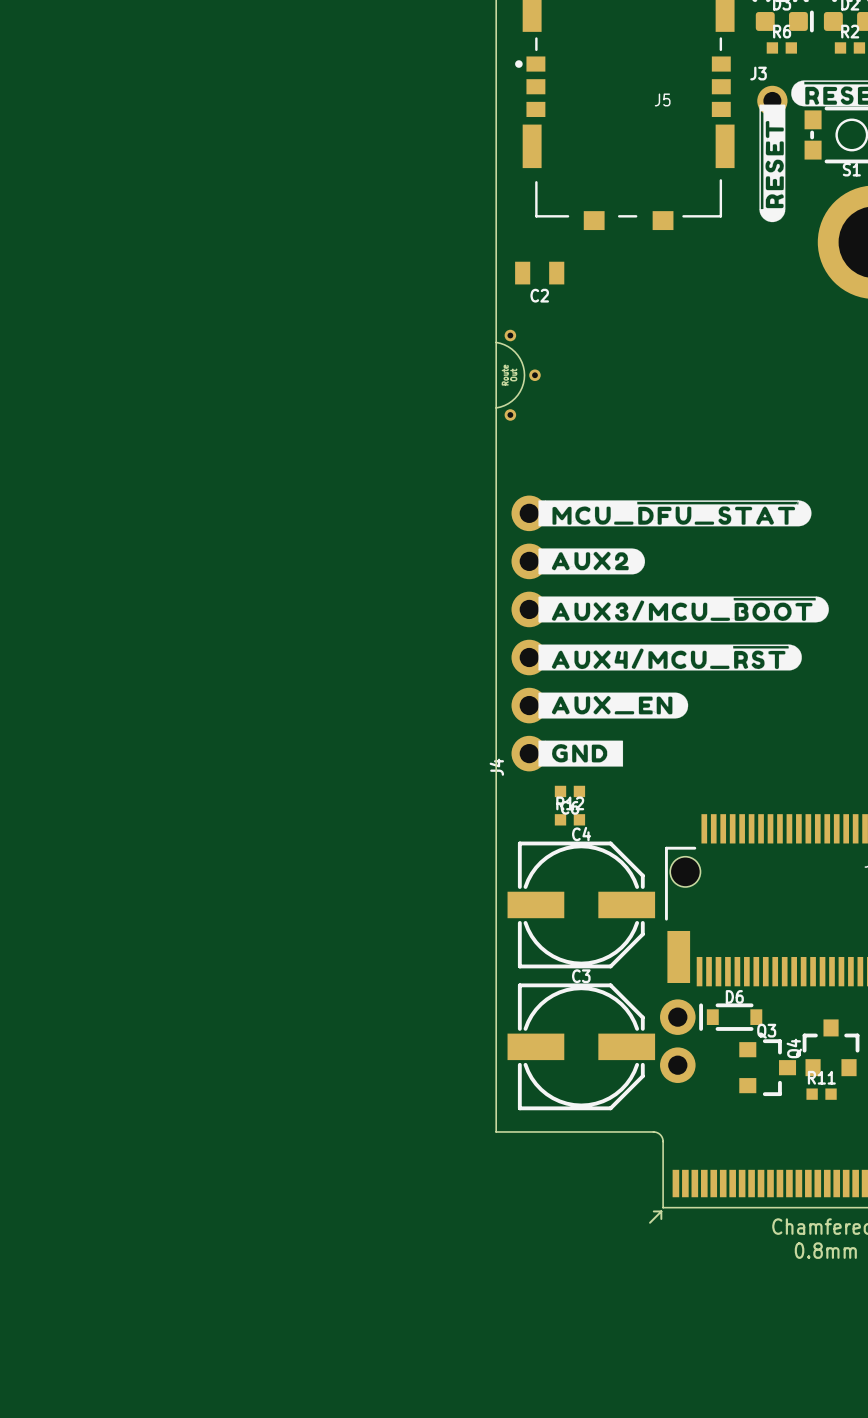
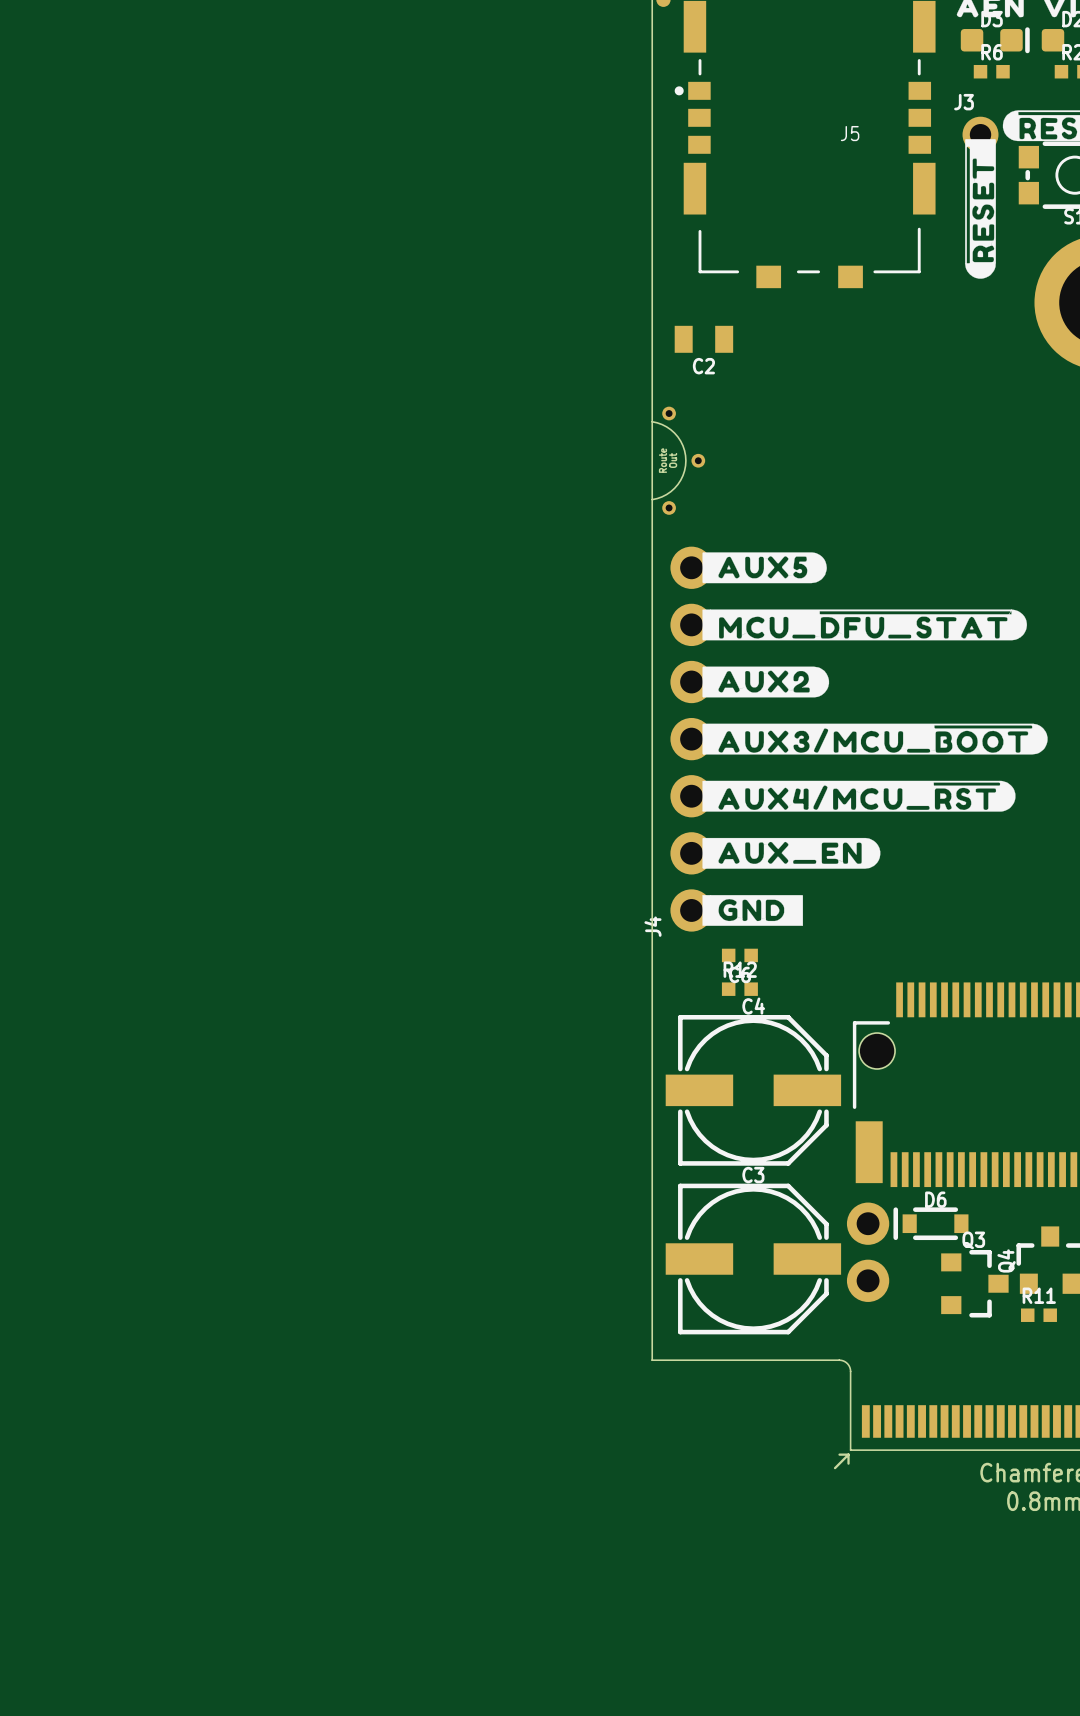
drawing: none -> [702, 552, 827, 584]
J4 footprint: [511, 495, 548, 772] -> [670, 546, 713, 932]

